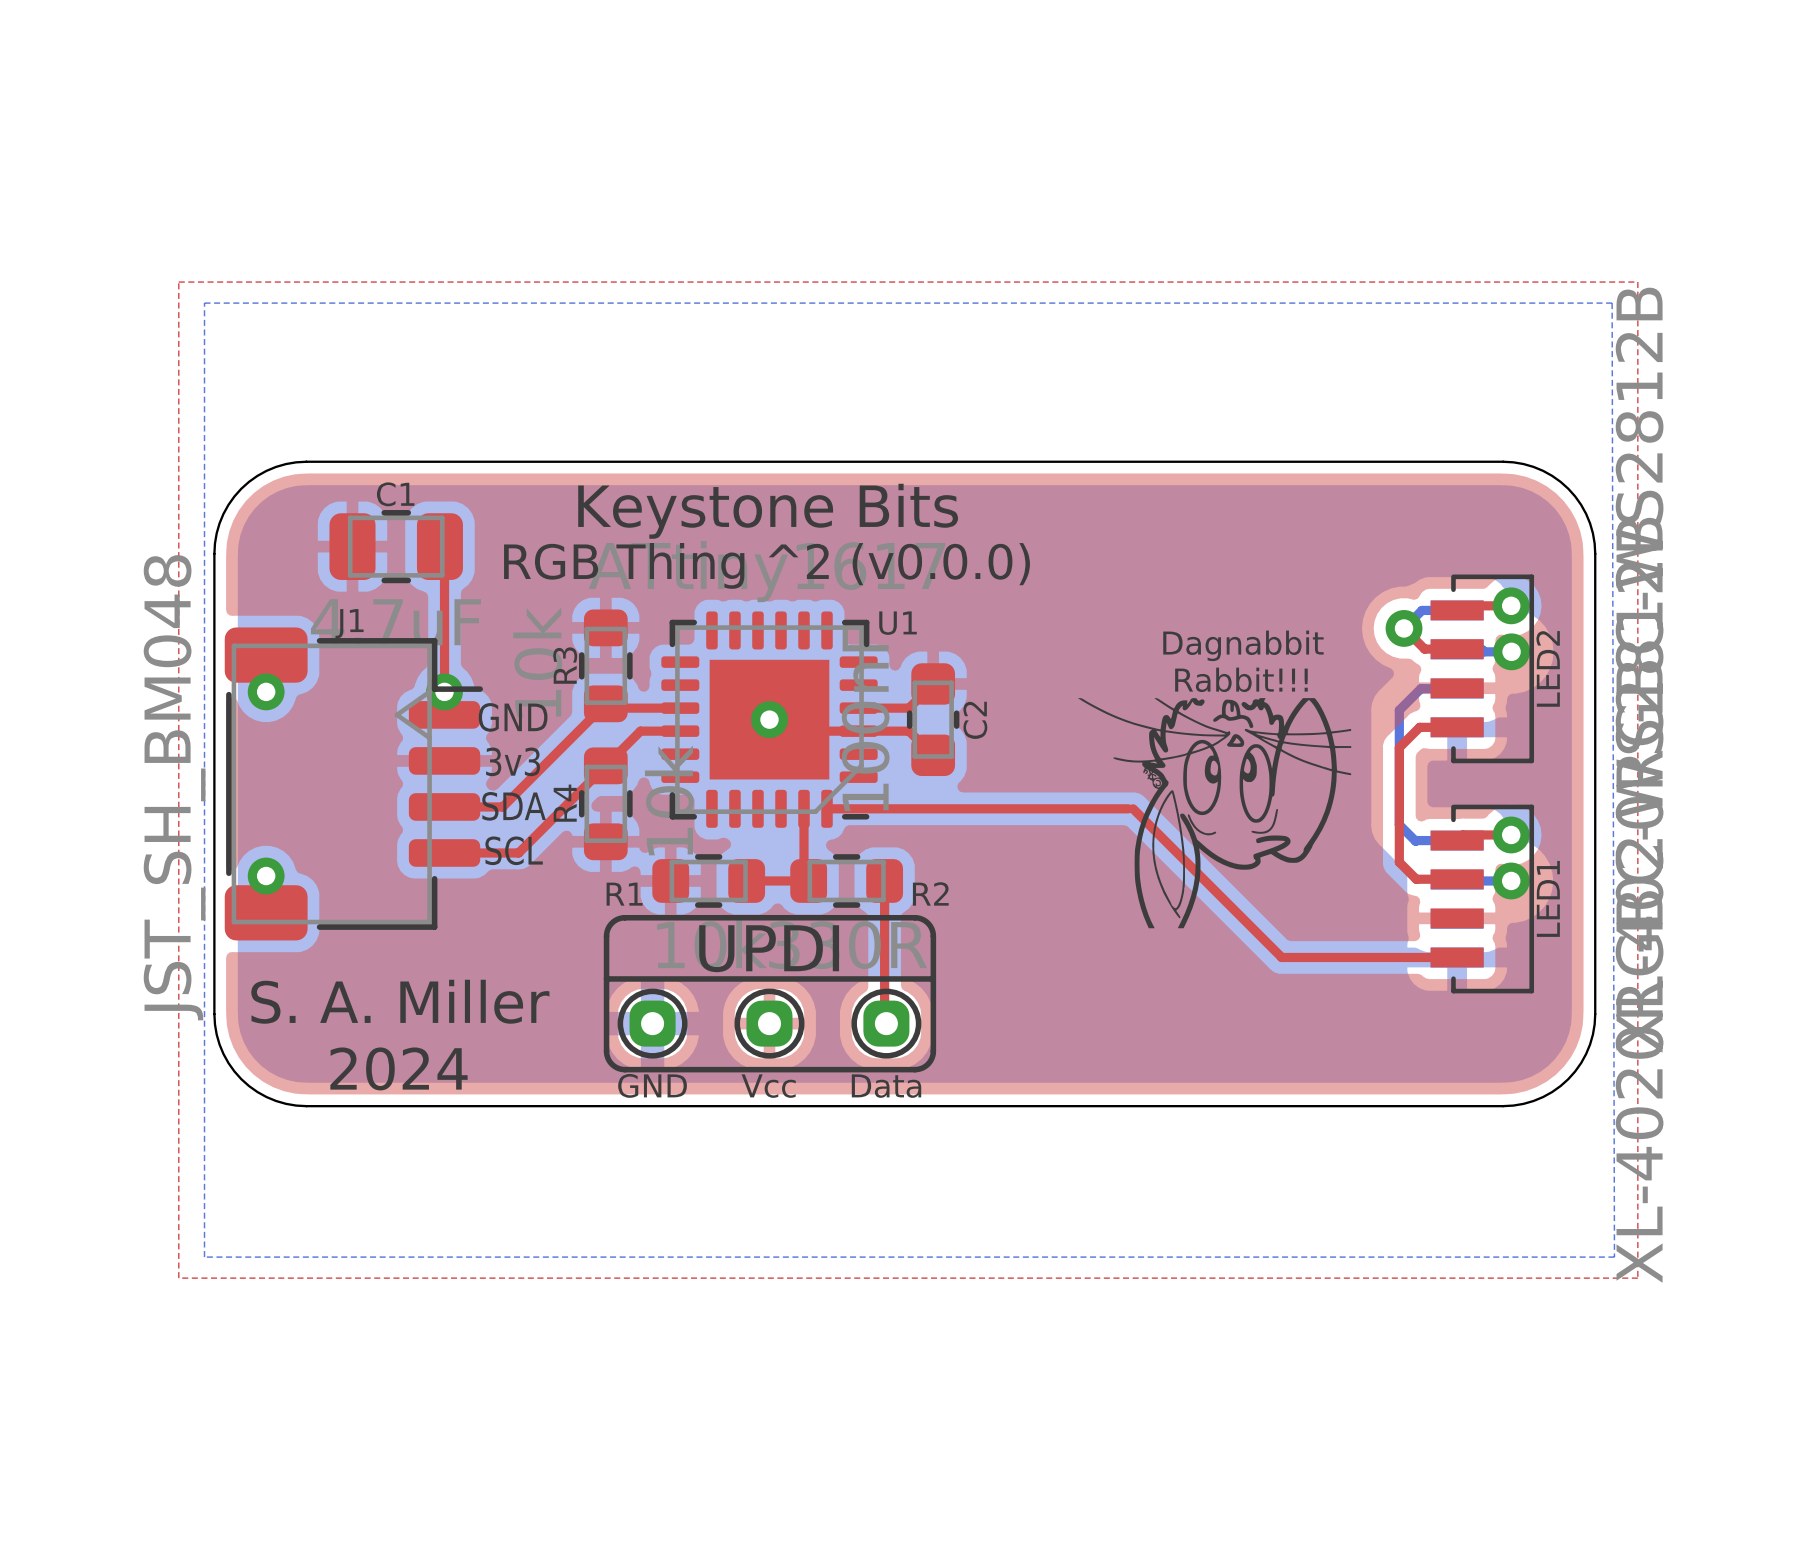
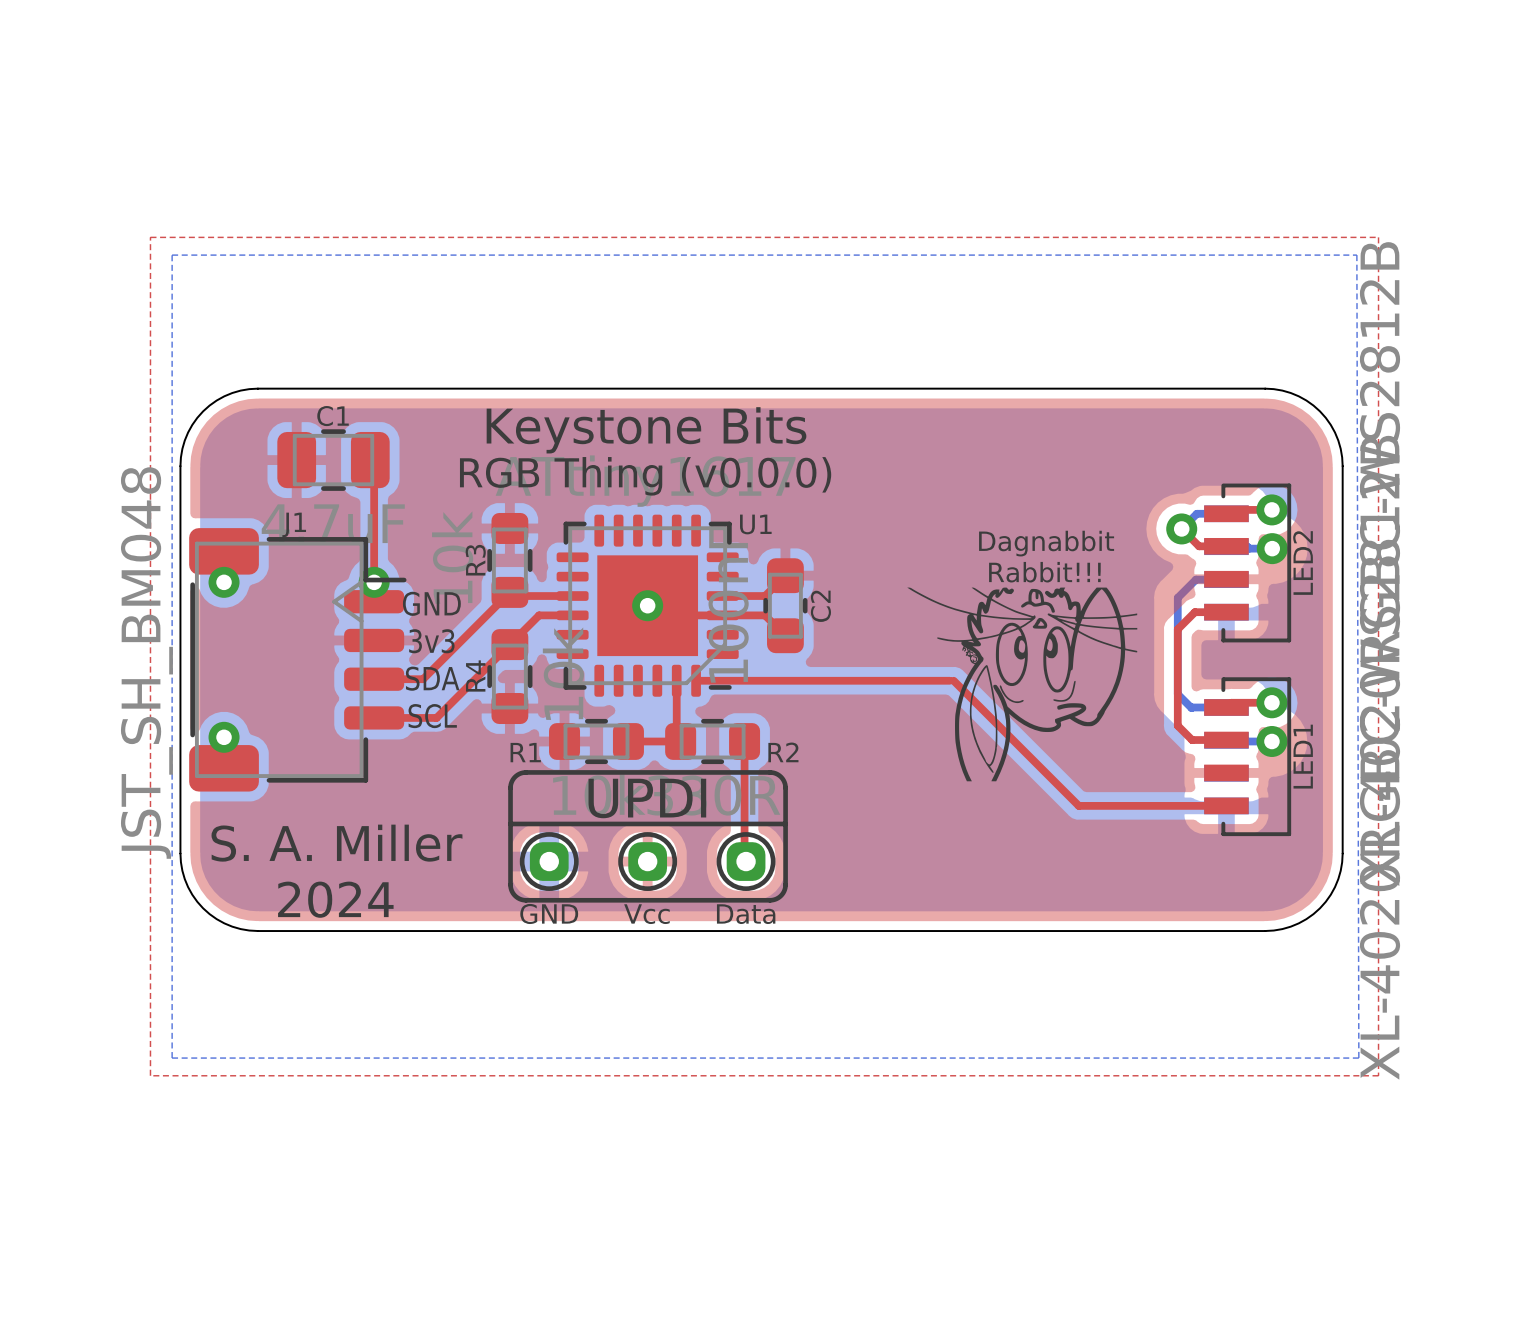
text: RGB Thing ^2 (v0.0.0) (767, 565) -> RGB Thing (v0.0.0) (645, 476)

